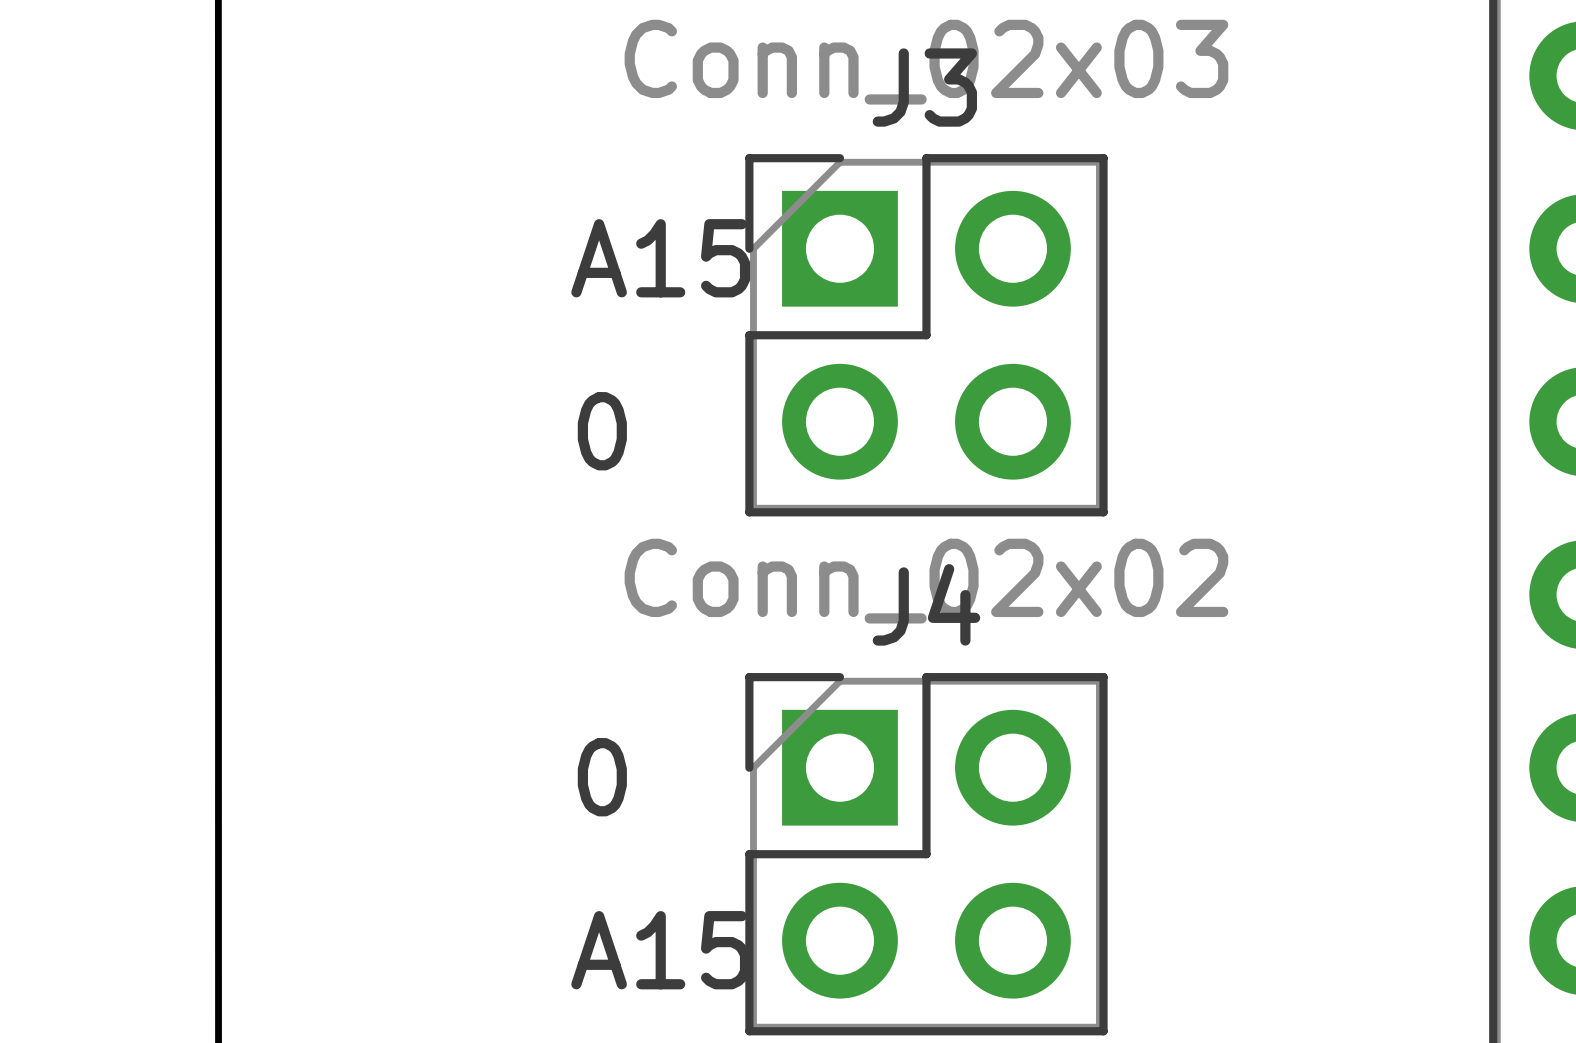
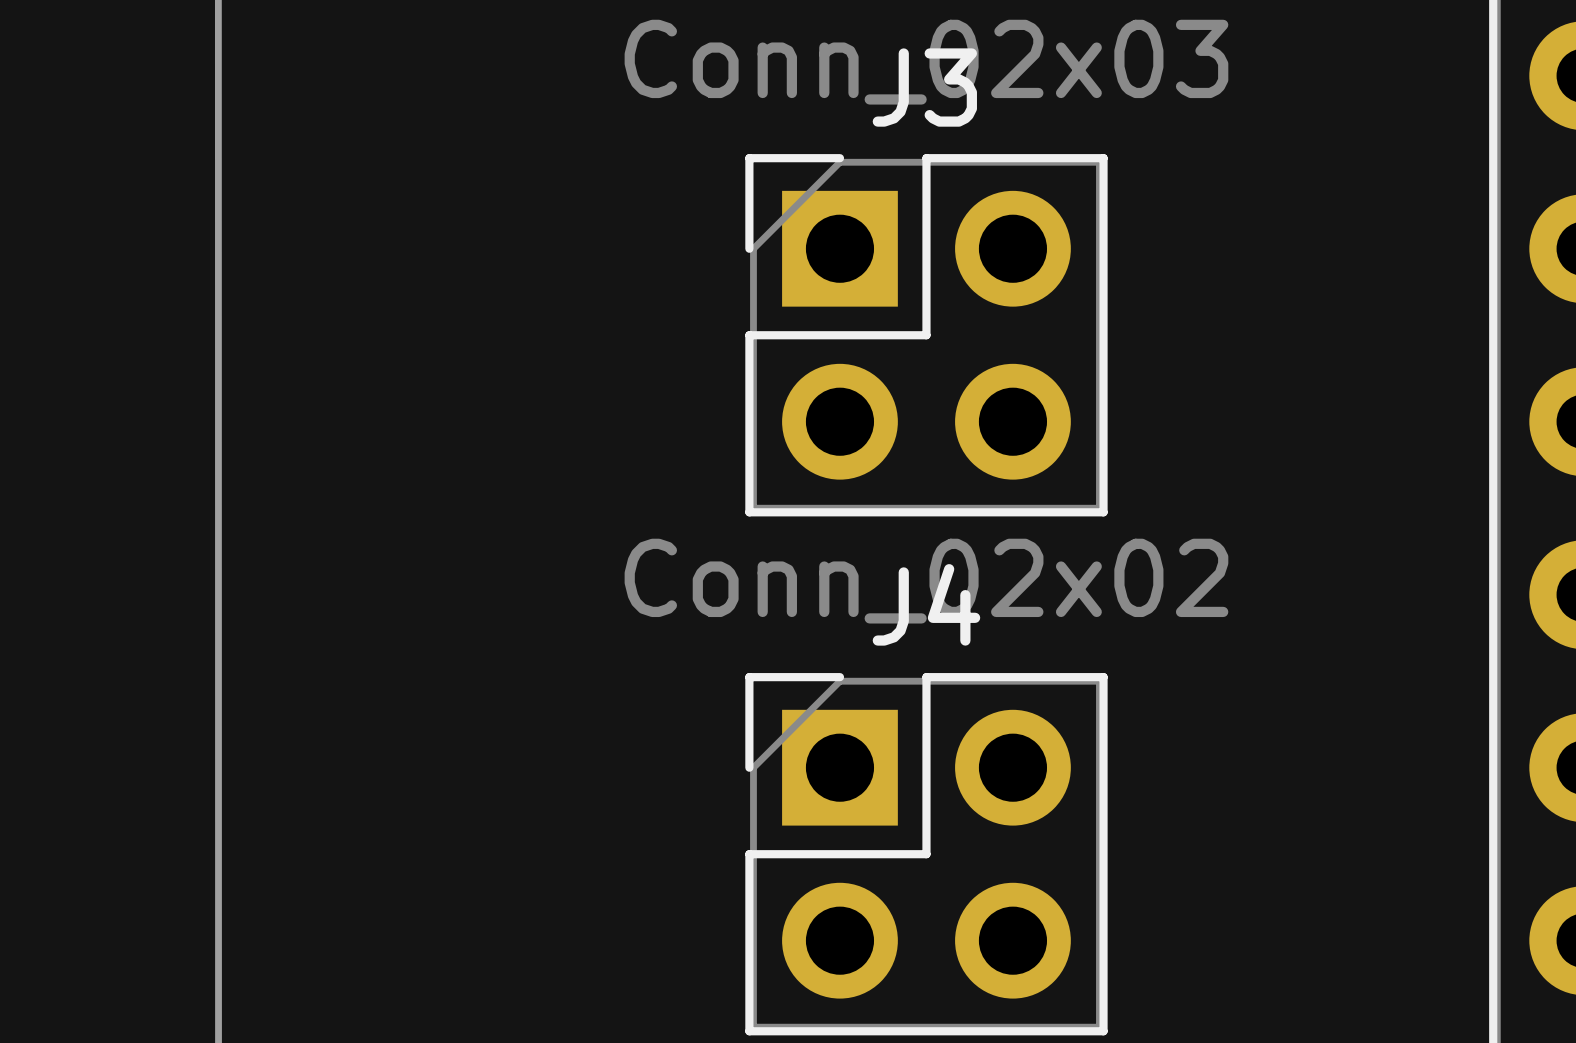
text: A15 (660, 258) -> none
text: 0 (602, 431) -> none
text: 0 (602, 777) -> none
text: A15 (660, 950) -> none

